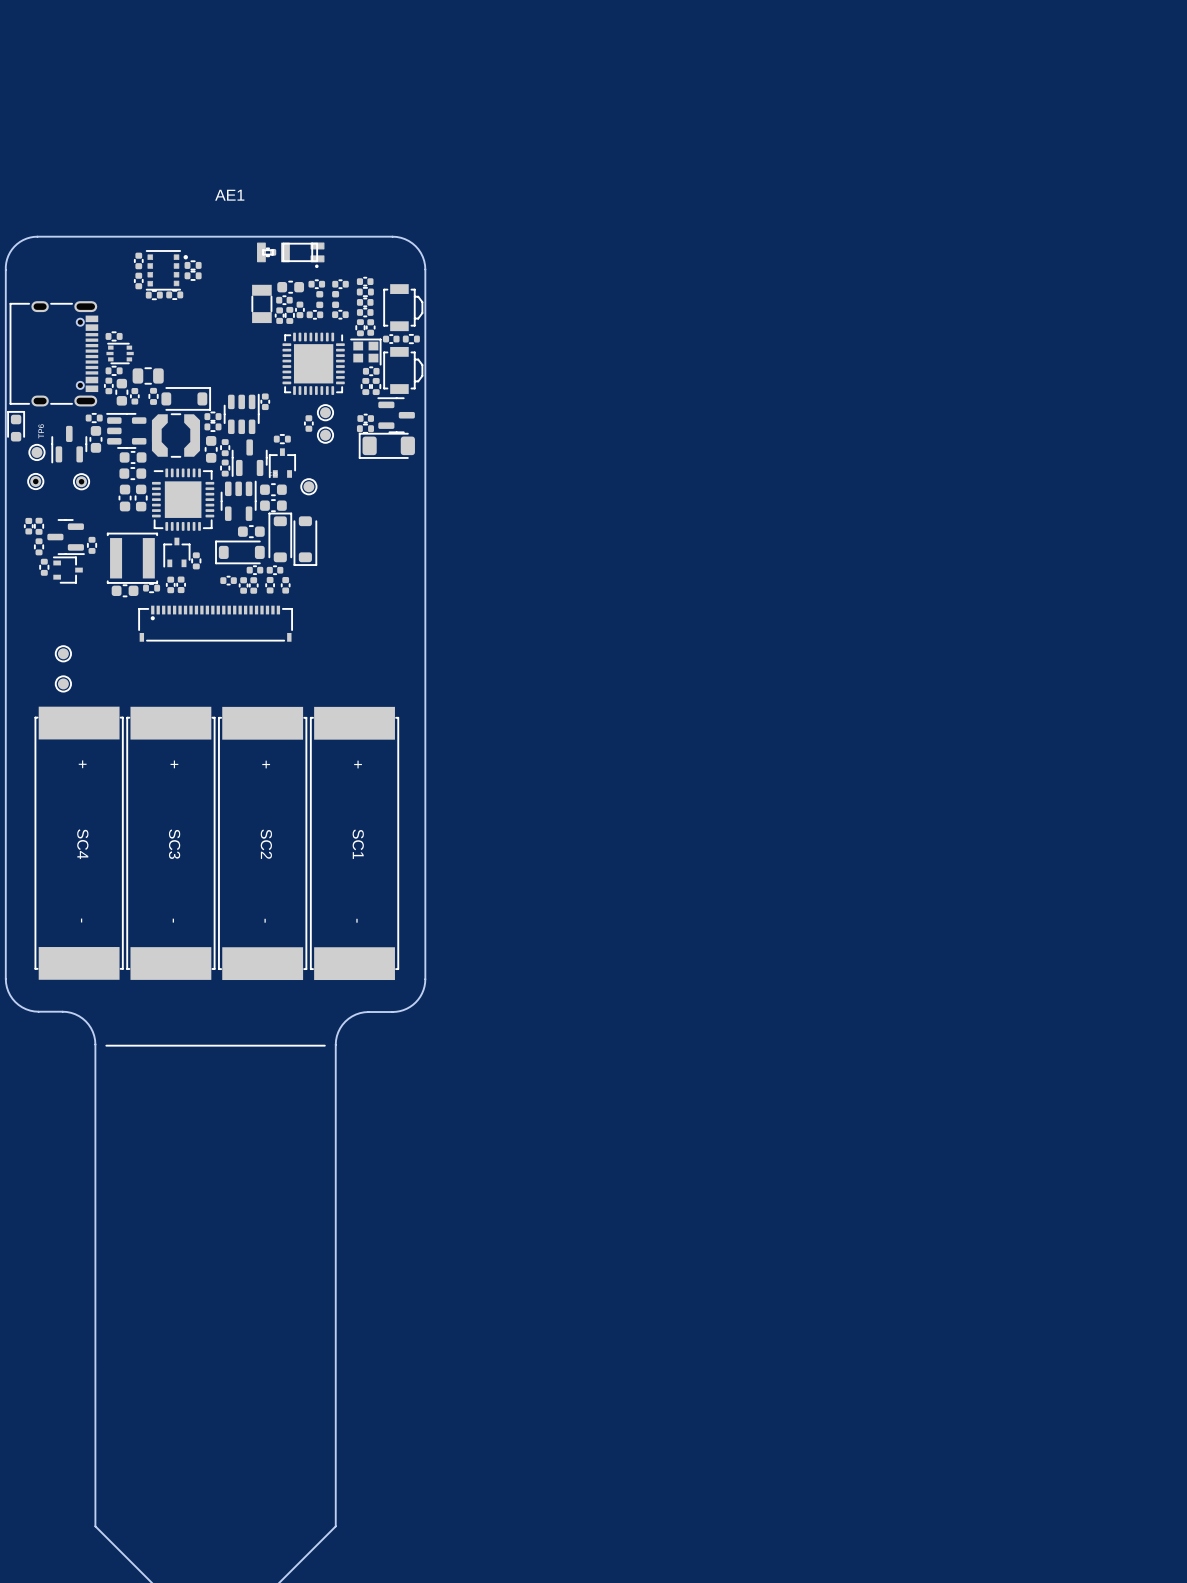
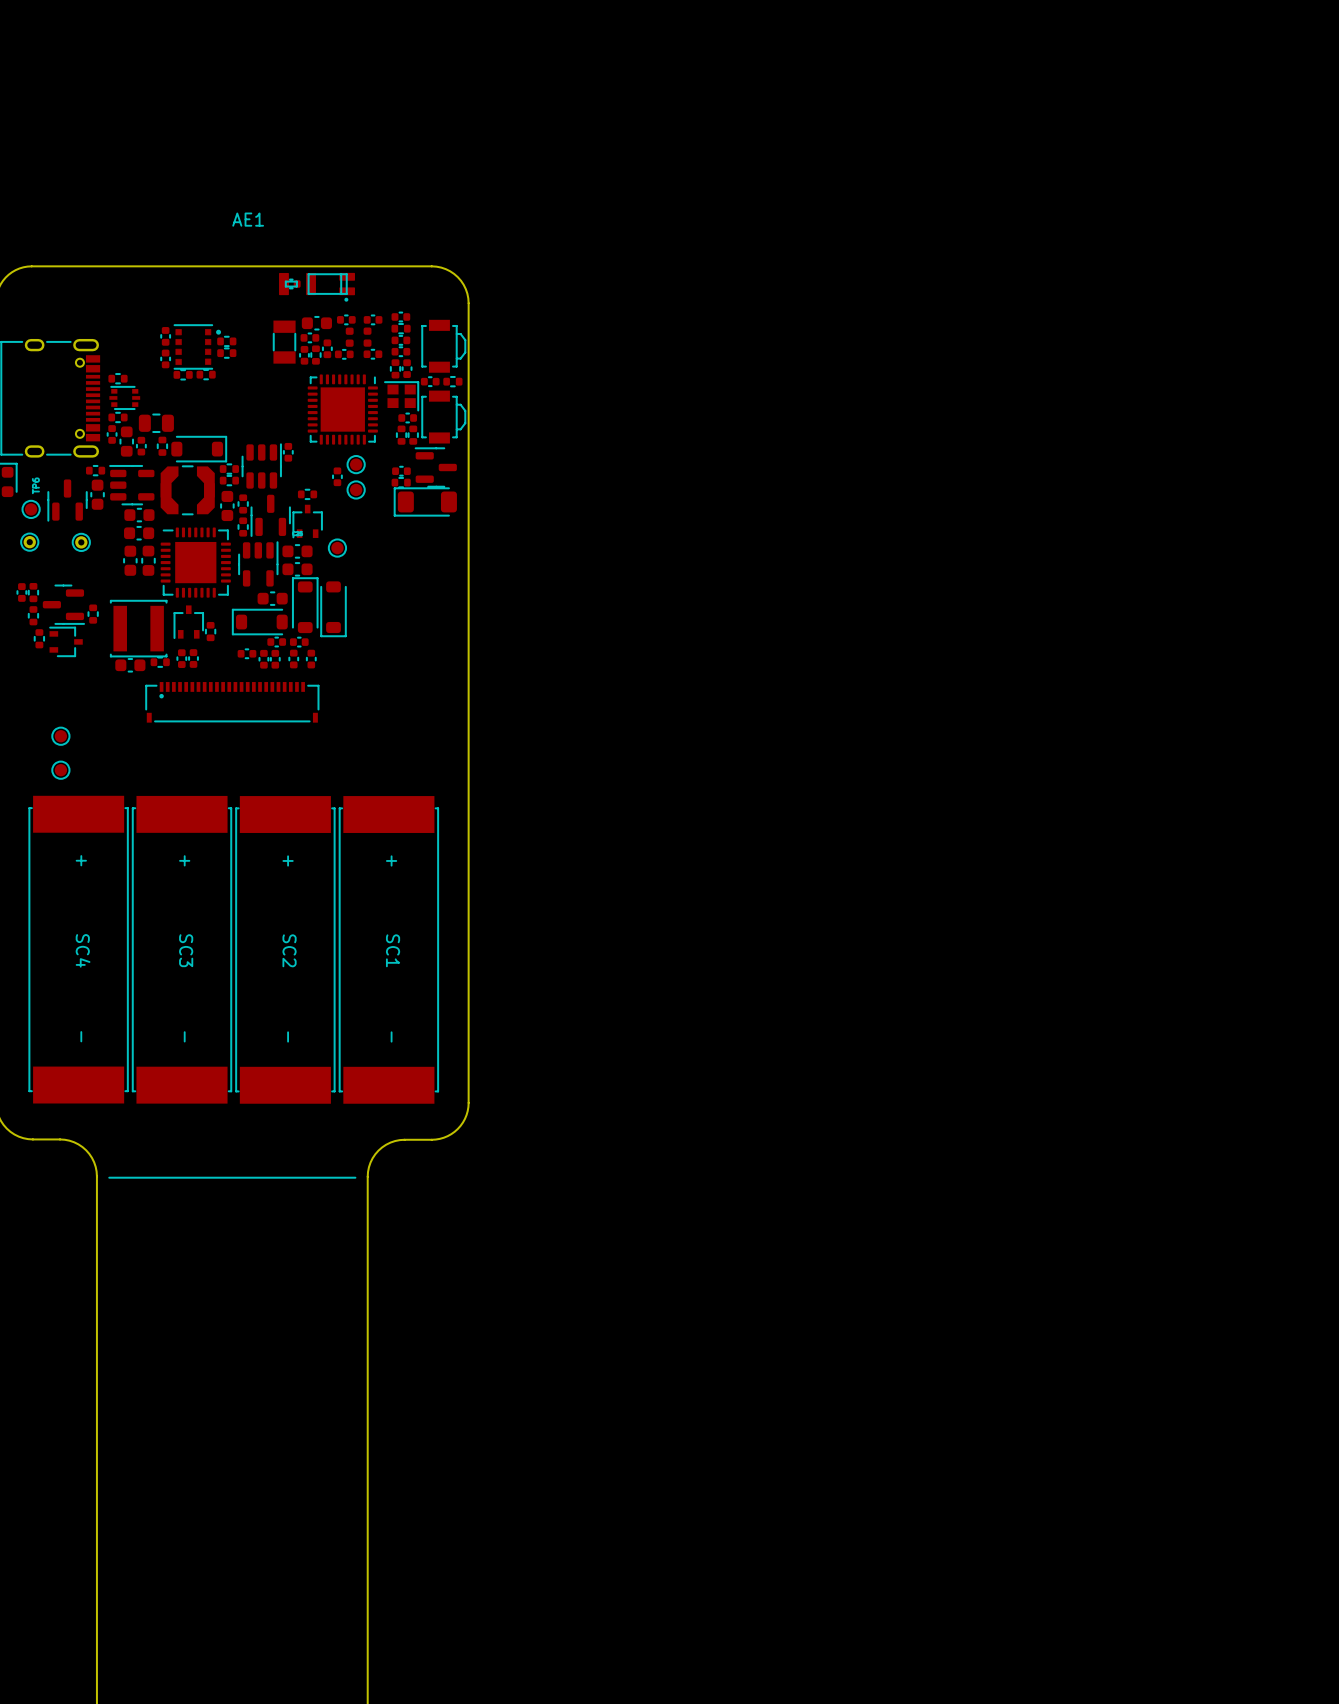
part: (138, 260) -> none
part: (193, 265) -> none
part position: (166, 270) -> (197, 346)
part: (193, 275) -> none
part: (138, 280) -> none
part footprint: [145, 290, 163, 300] -> [160, 327, 171, 346]
part: (174, 294) -> none
part: none -> (226, 341)
part: none -> (226, 353)
part: none -> (165, 358)
part: none -> (206, 374)
part: none -> (183, 374)

